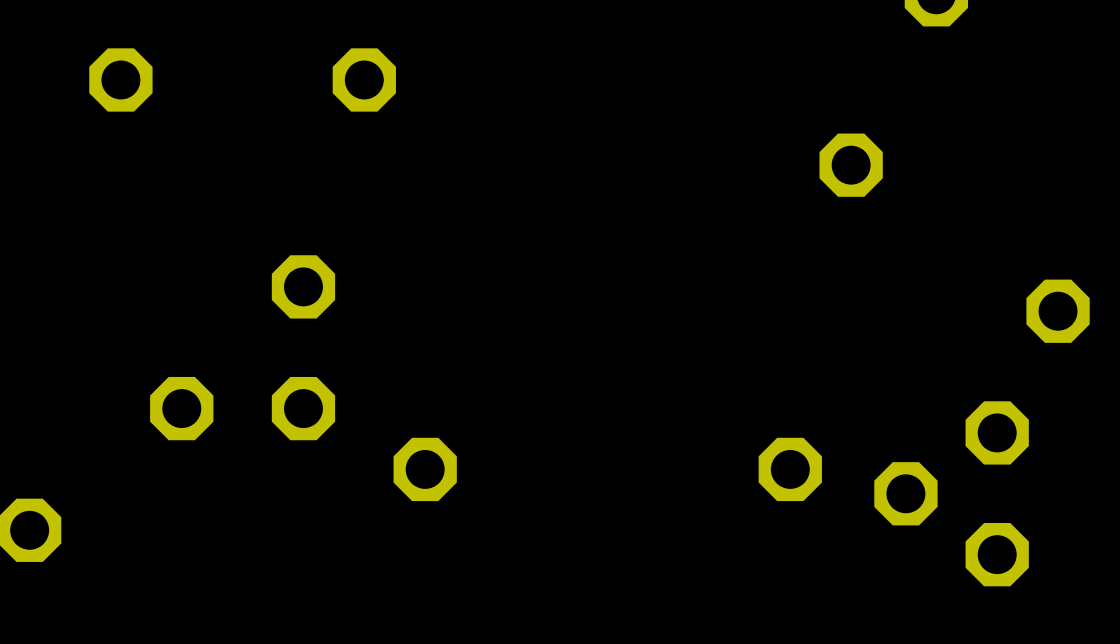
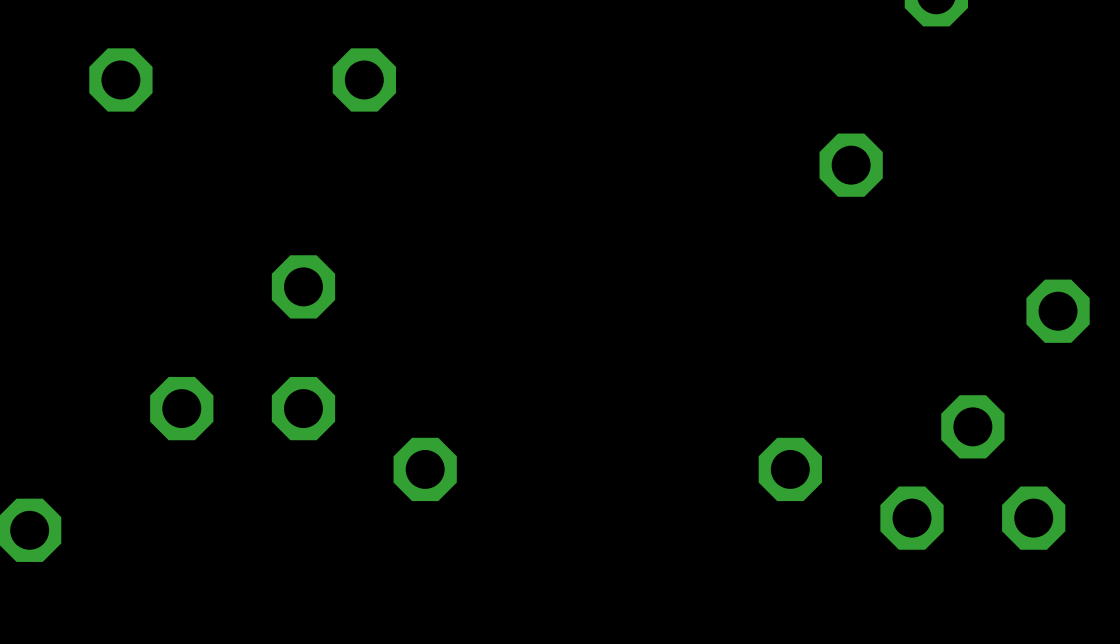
part rotation: 0° (951, 493) -> 90° clockwise (972, 472)

